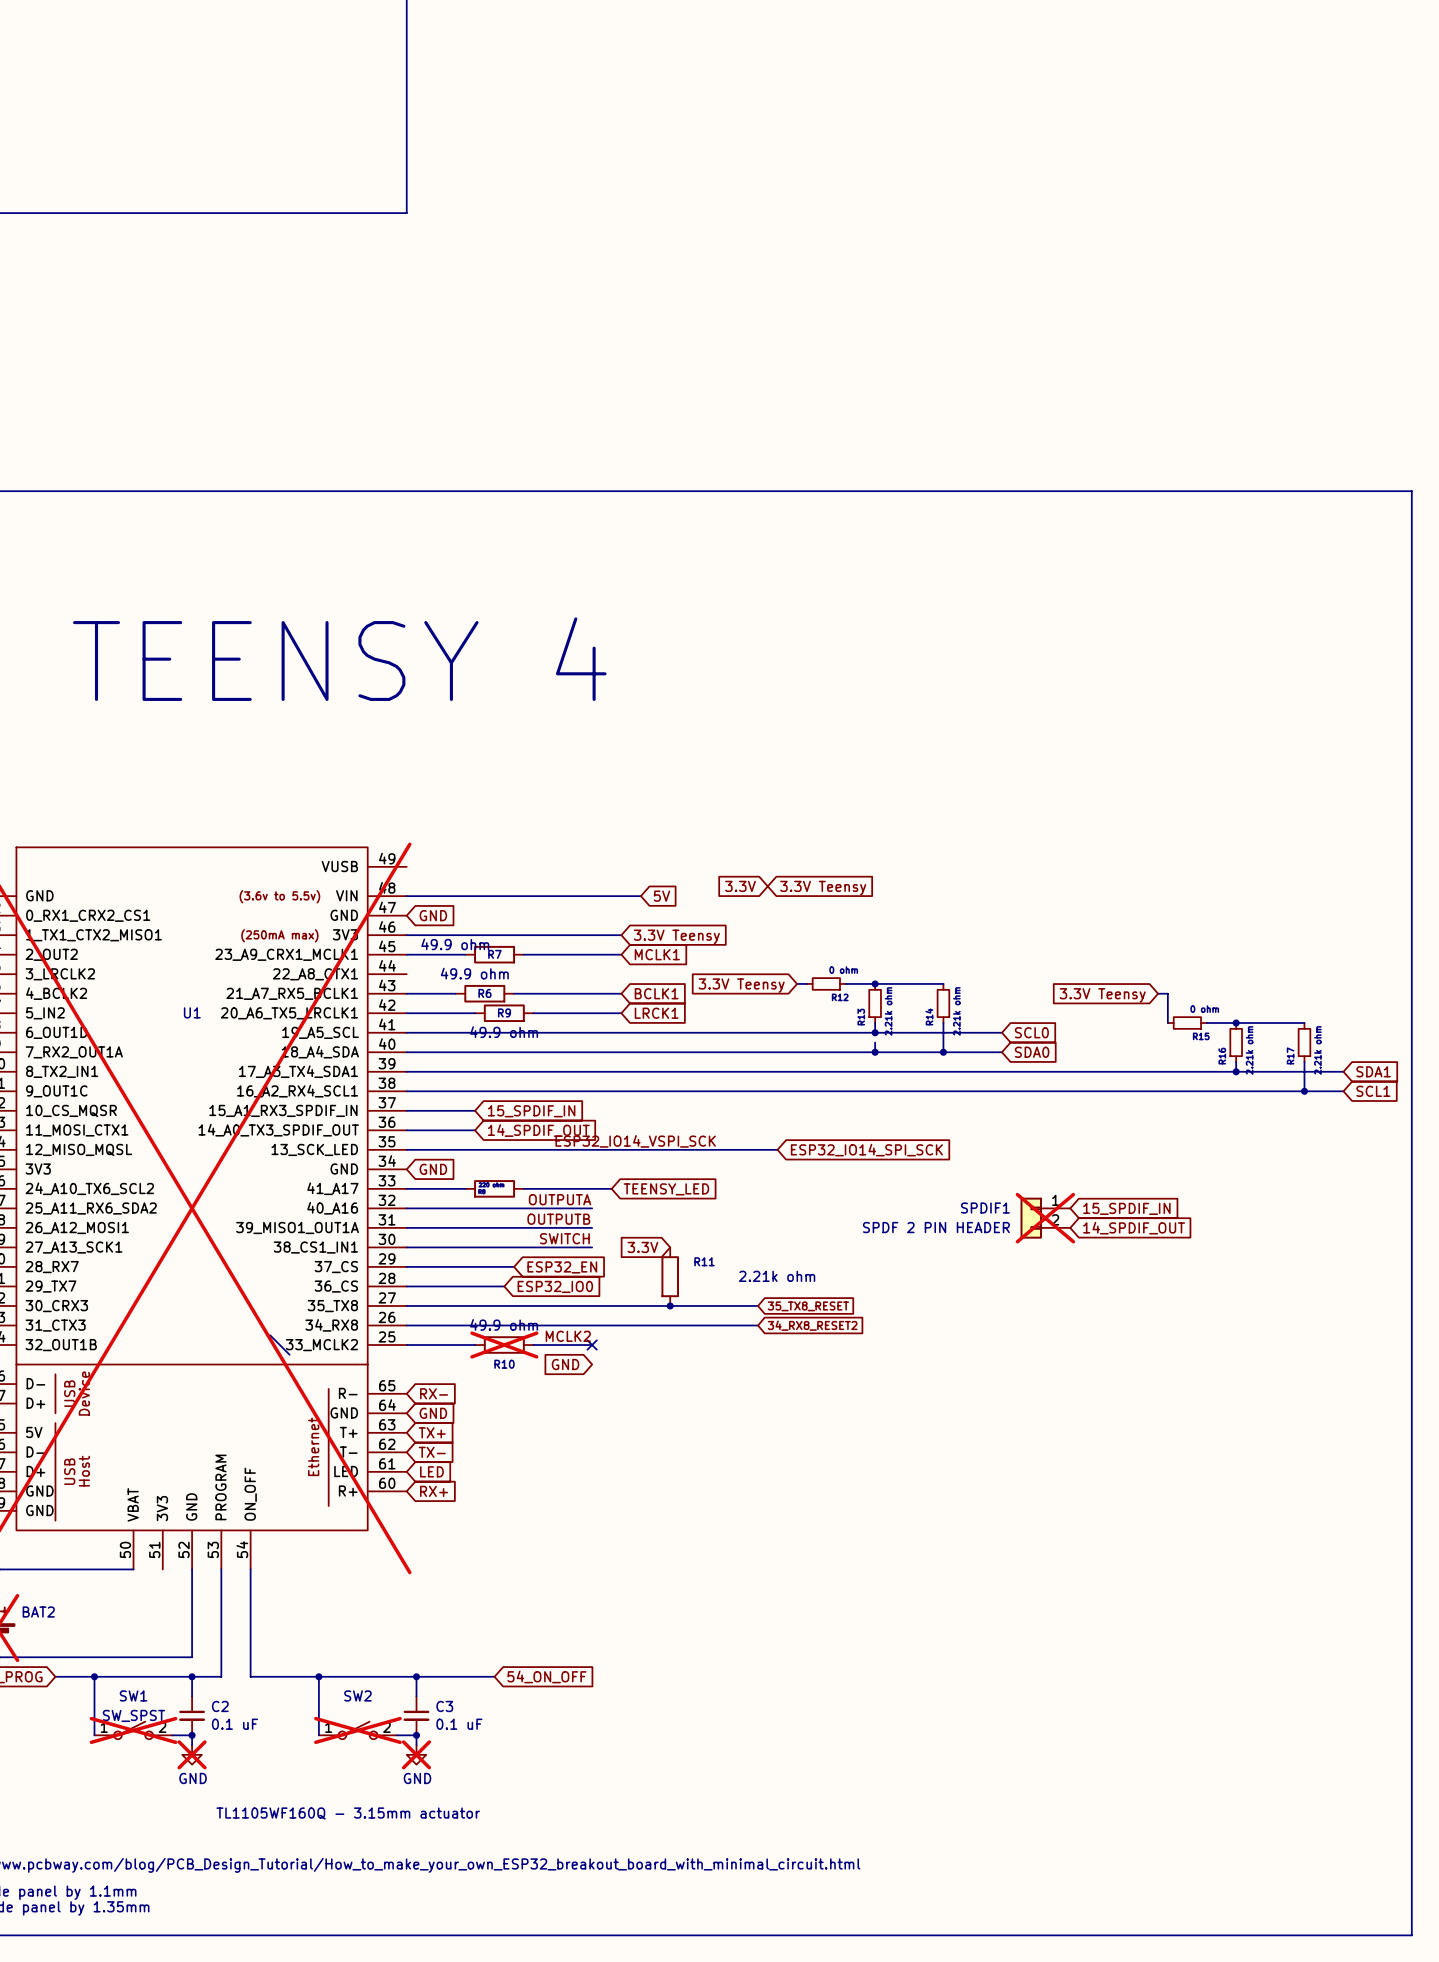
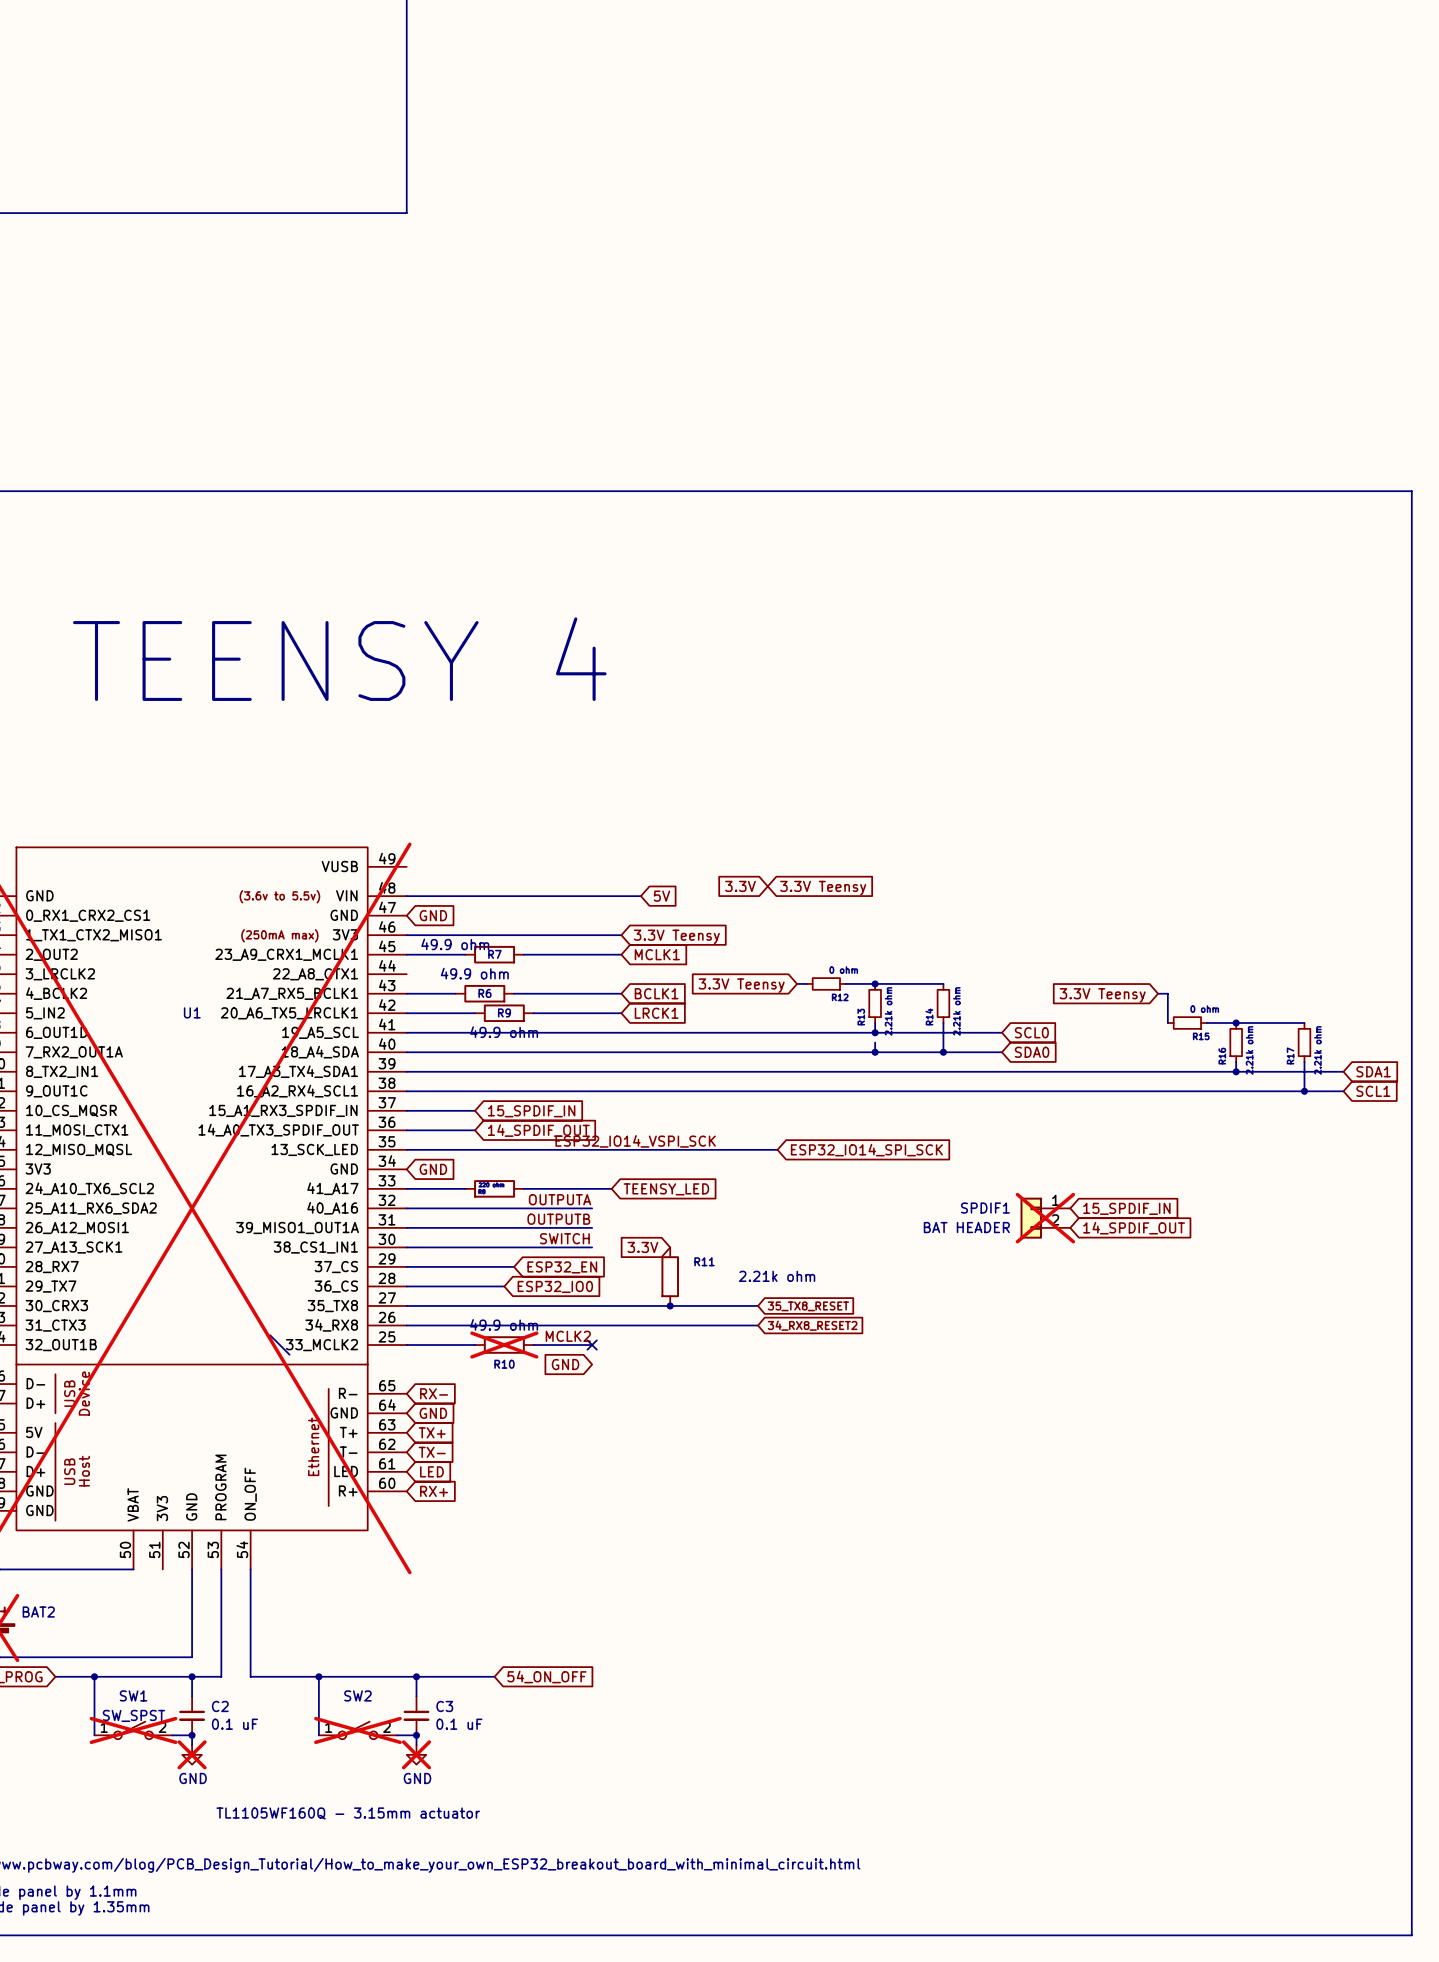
SPDIF1 value: SPDF 2 PIN HEADER (936, 1227) -> BAT HEADER (966, 1227)

